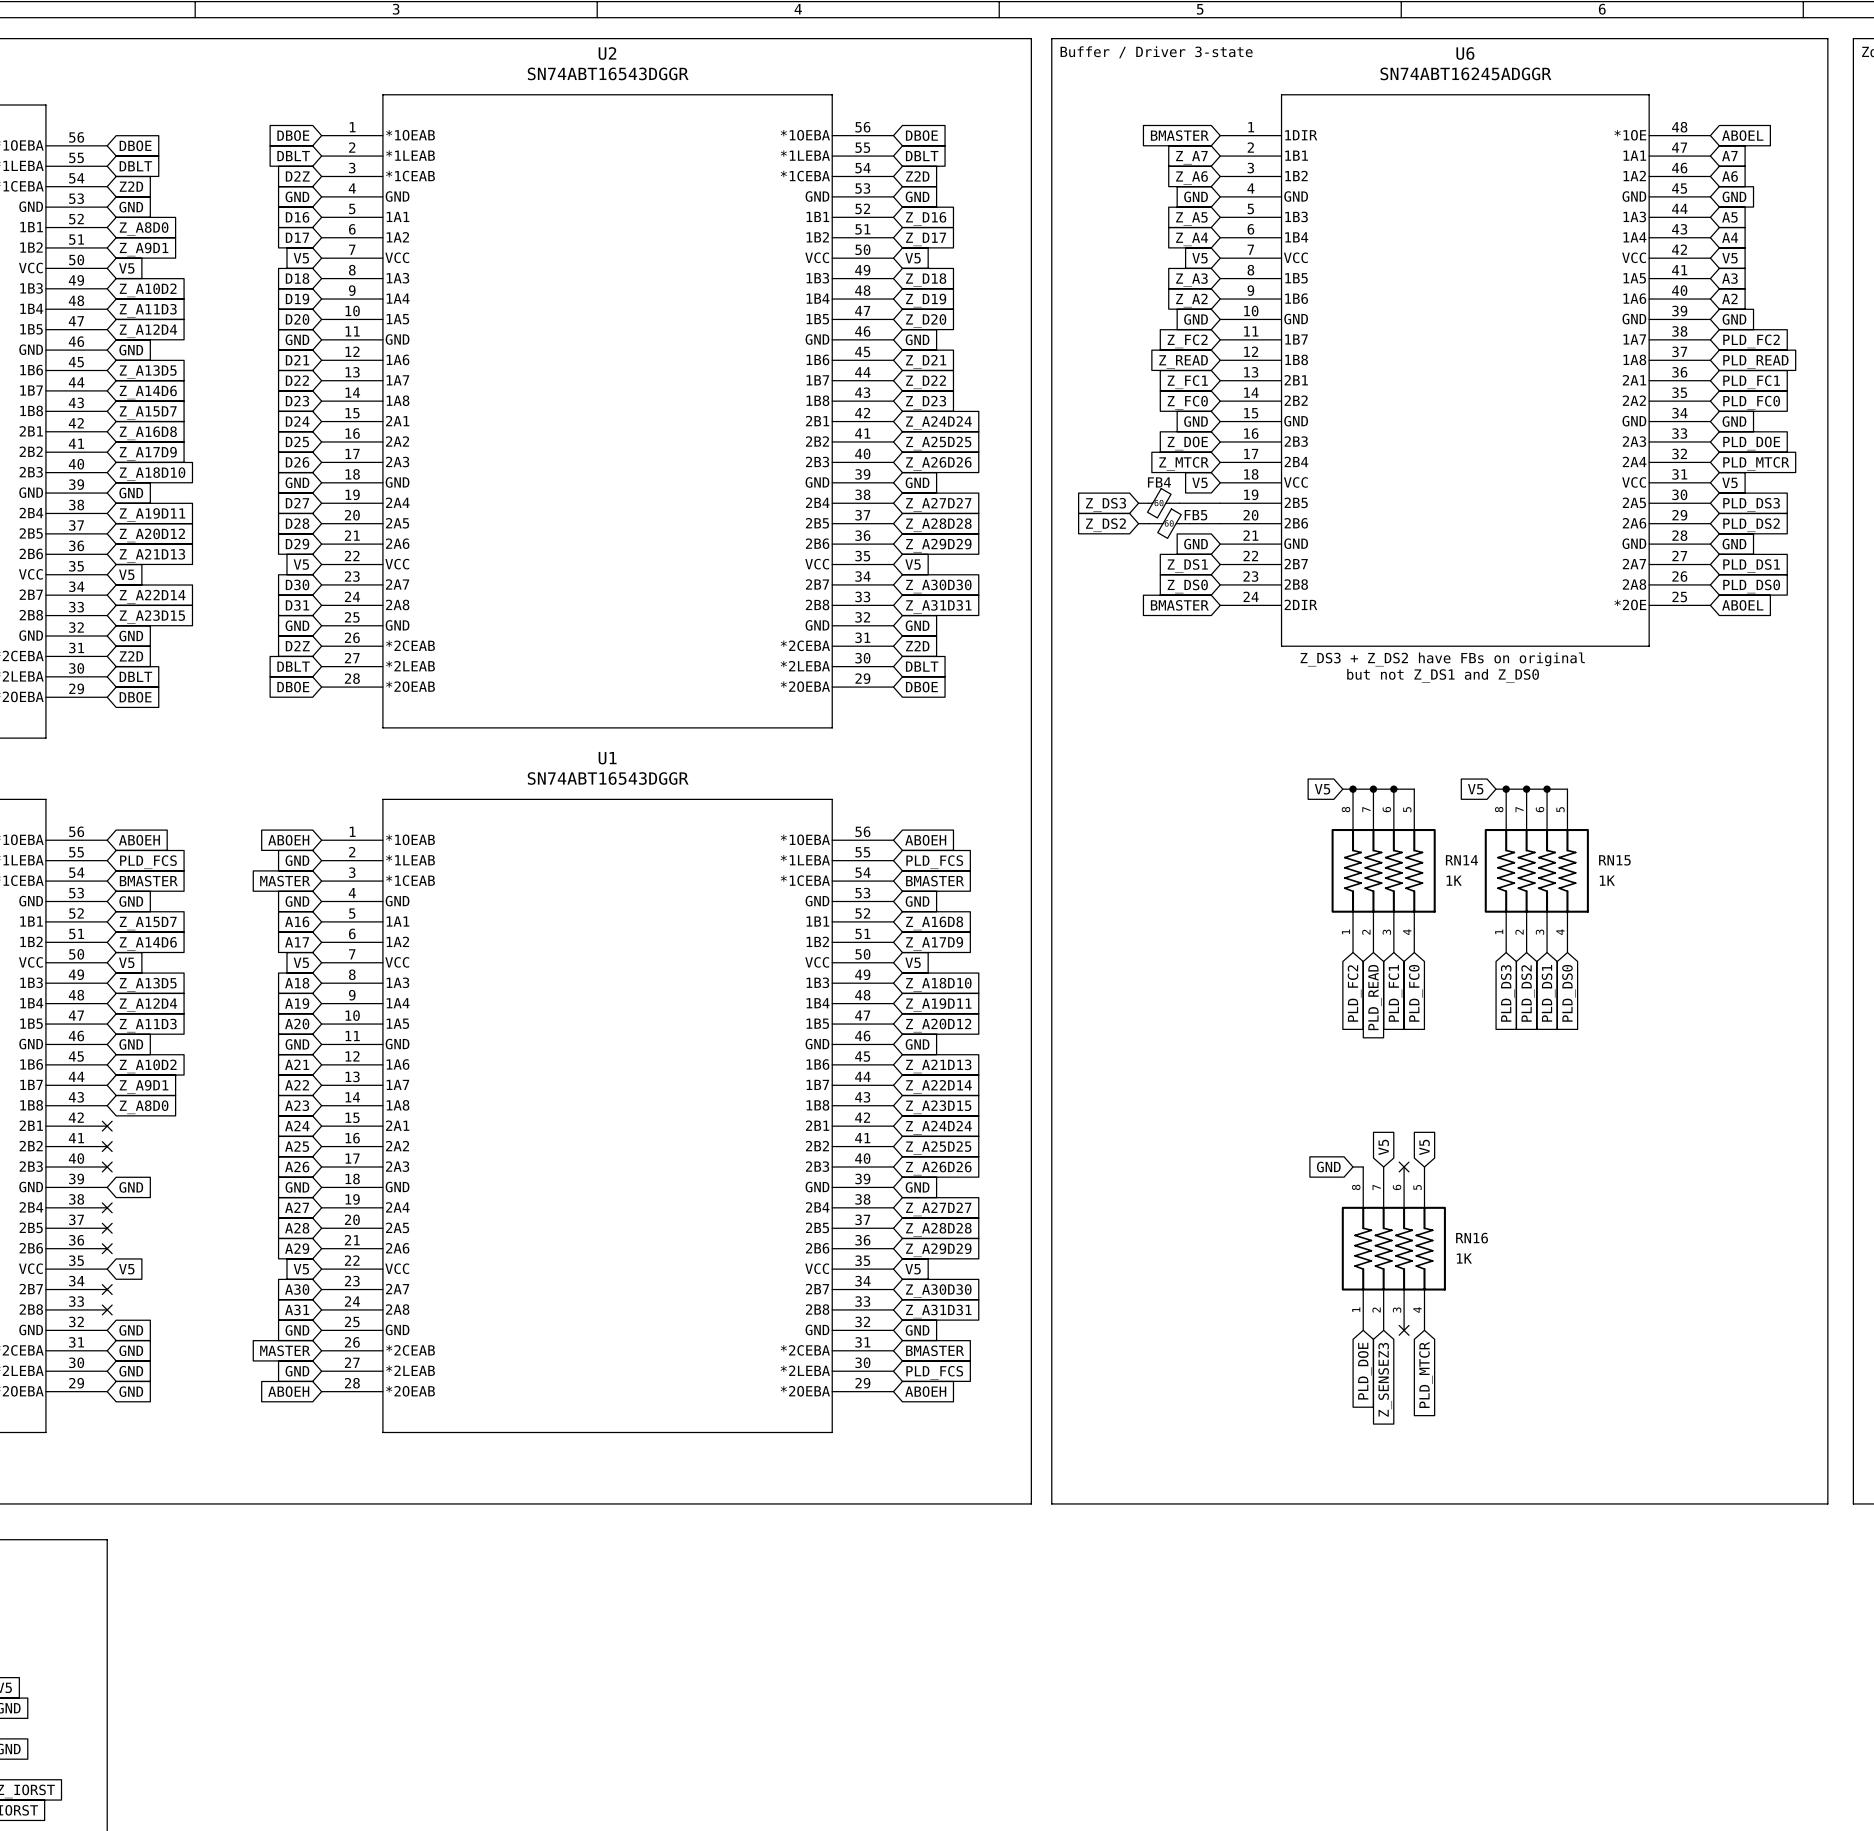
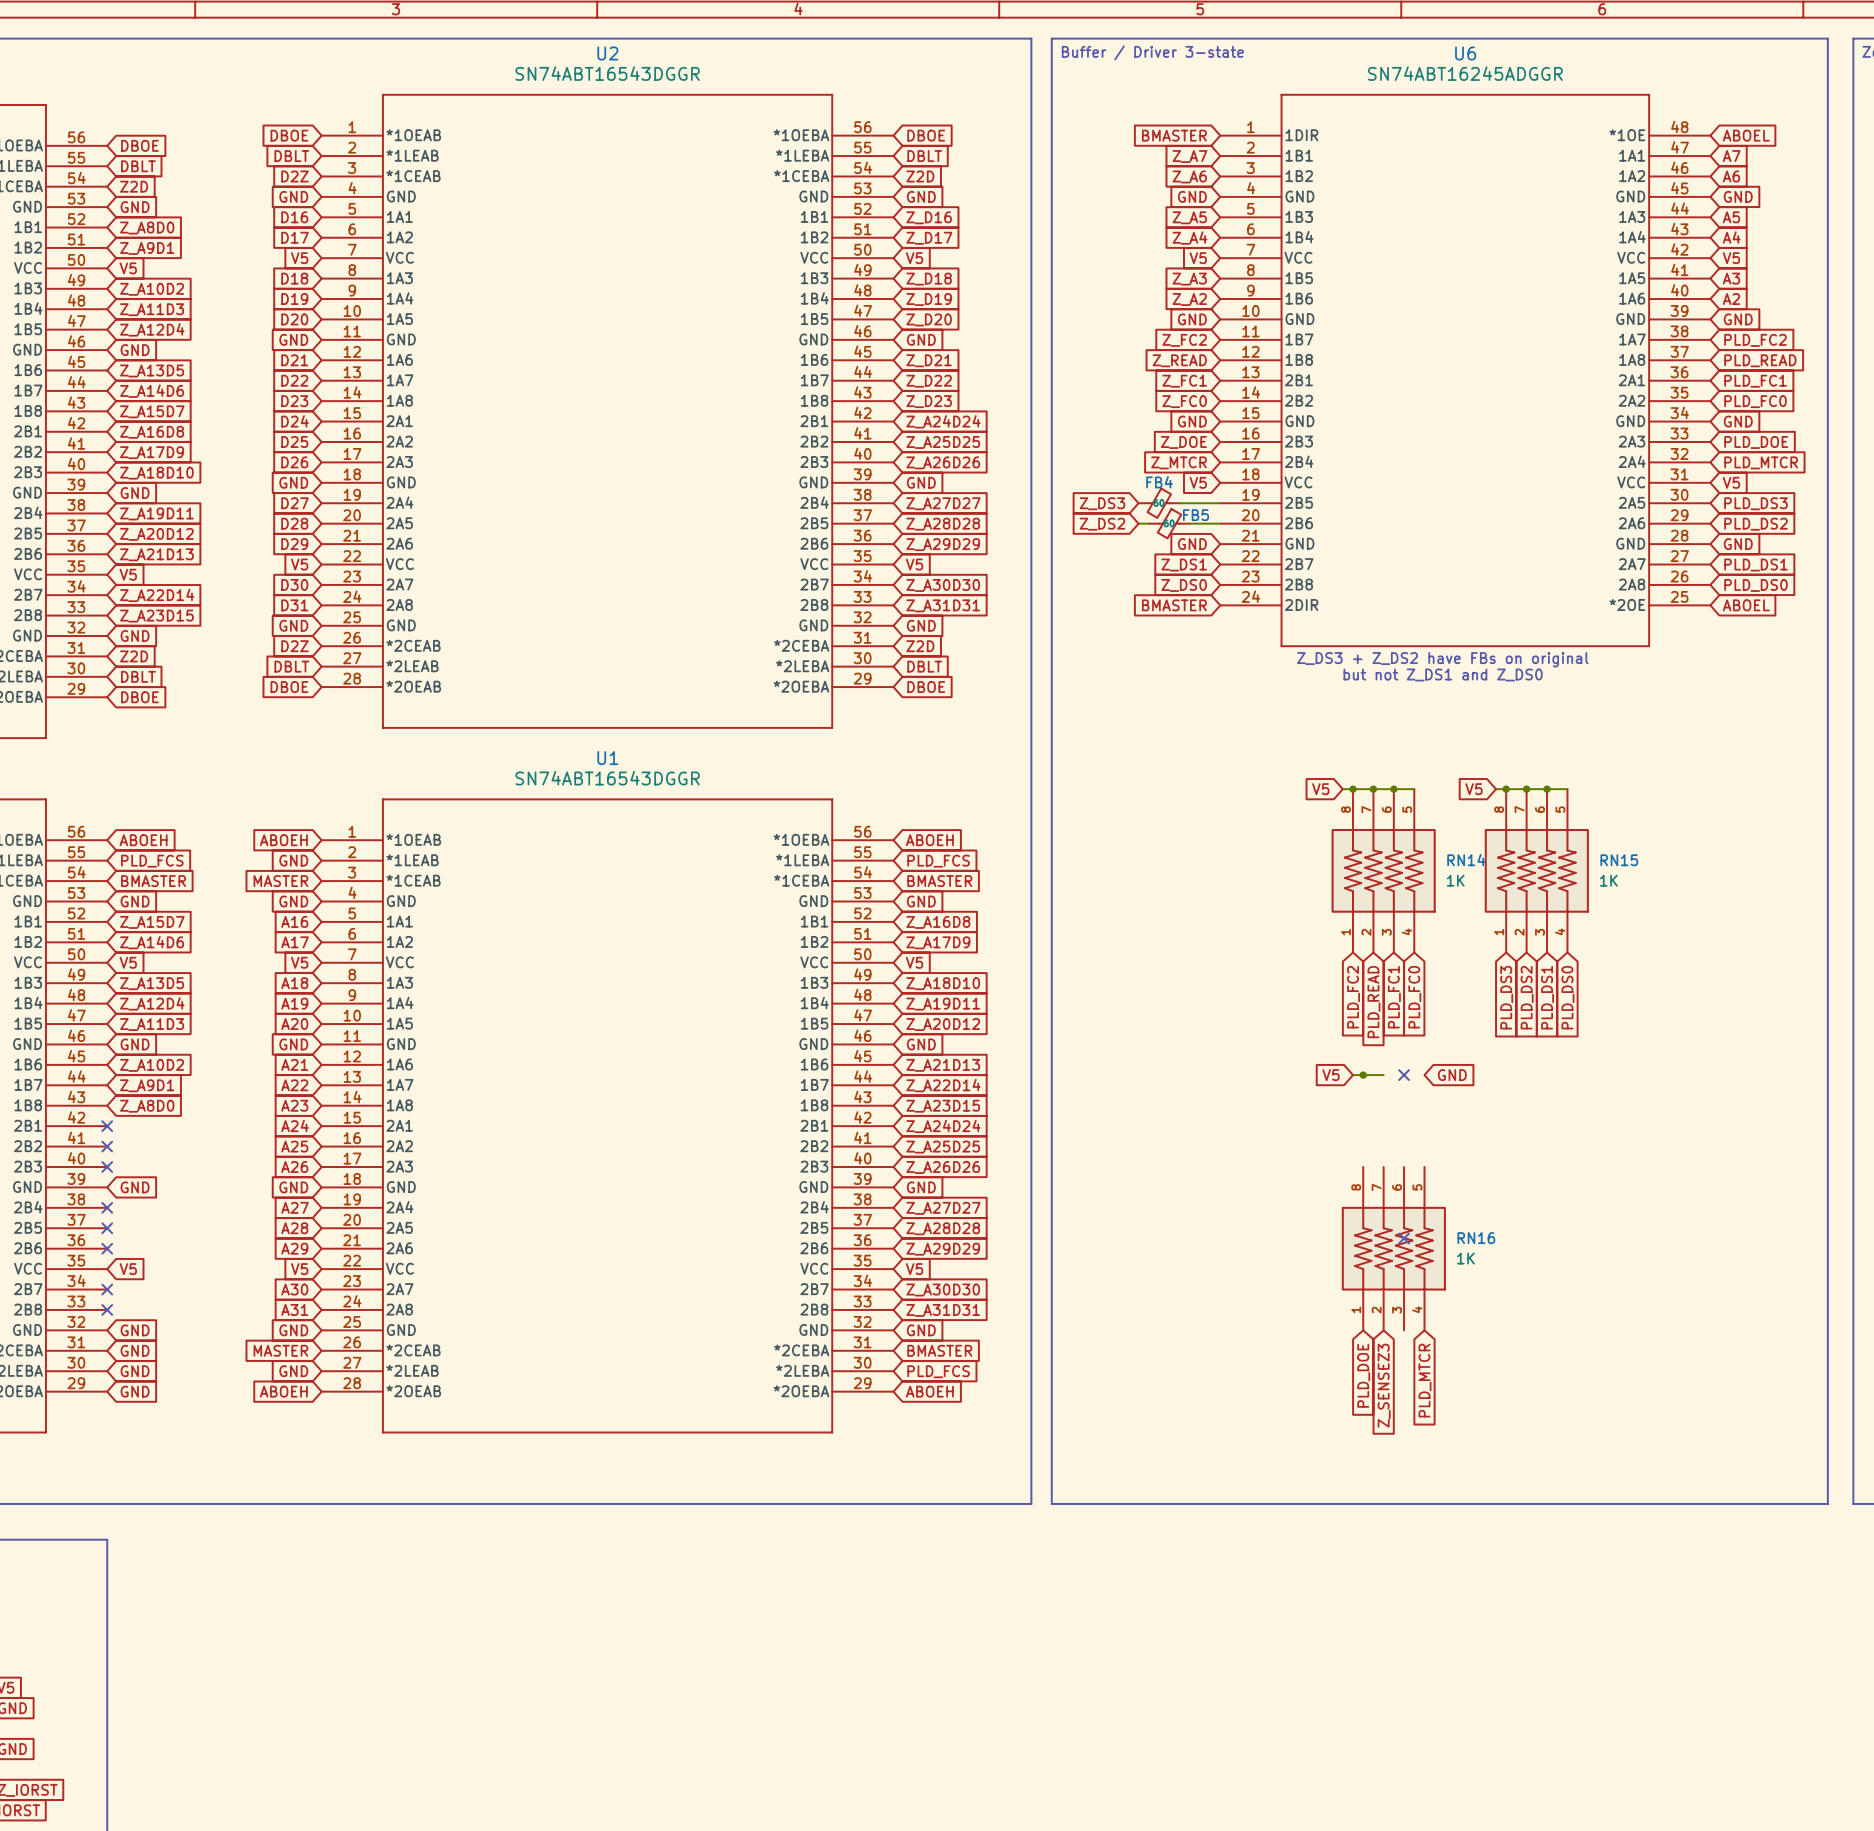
global label: none -> V5 (1331, 1075)
wire: none -> (1353, 1075) (1383, 1075)
junction: none -> (1363, 1075)
no-connect mark: none -> (1404, 1075)
global label: V5 (1383, 1147) -> none
global label: V5 (1424, 1147) -> none
wire: (1353, 1166) (1363, 1166) -> none
no-connect mark: (1404, 1166) -> none
global label rotation: 0° (1328, 1167) -> 180° (1452, 1075)
global label position: GND (1328, 1167) -> GND (1452, 1075)
no-connect mark: none -> (1404, 1238)
no-connect mark: (1404, 1330) -> none

